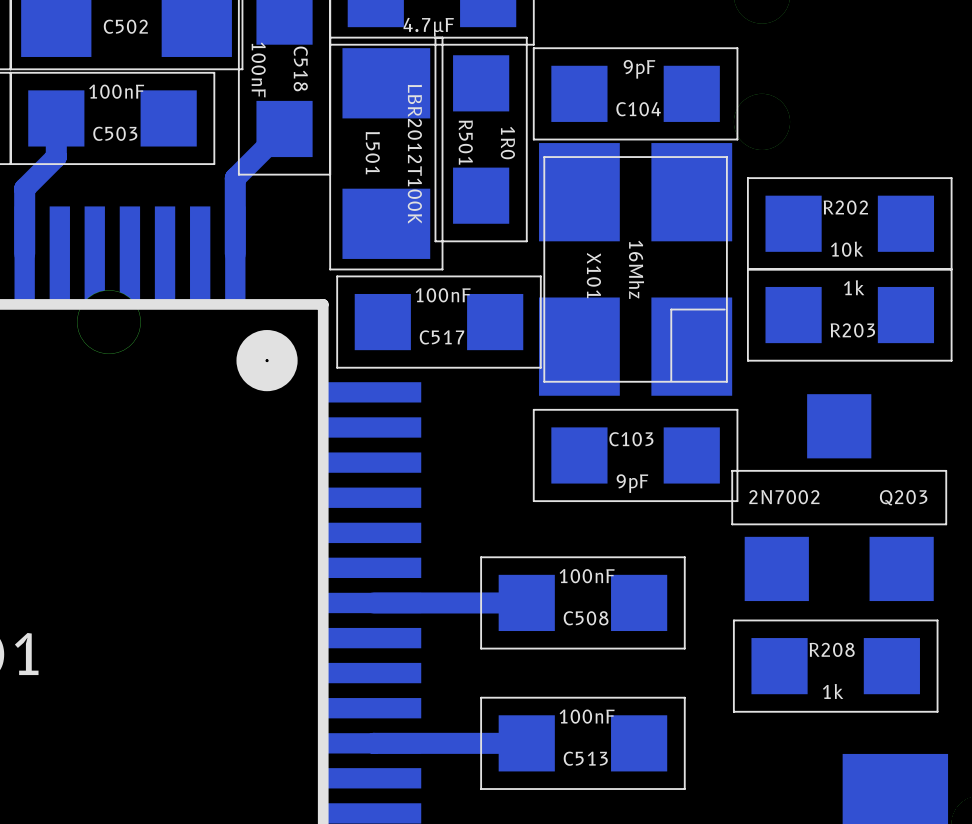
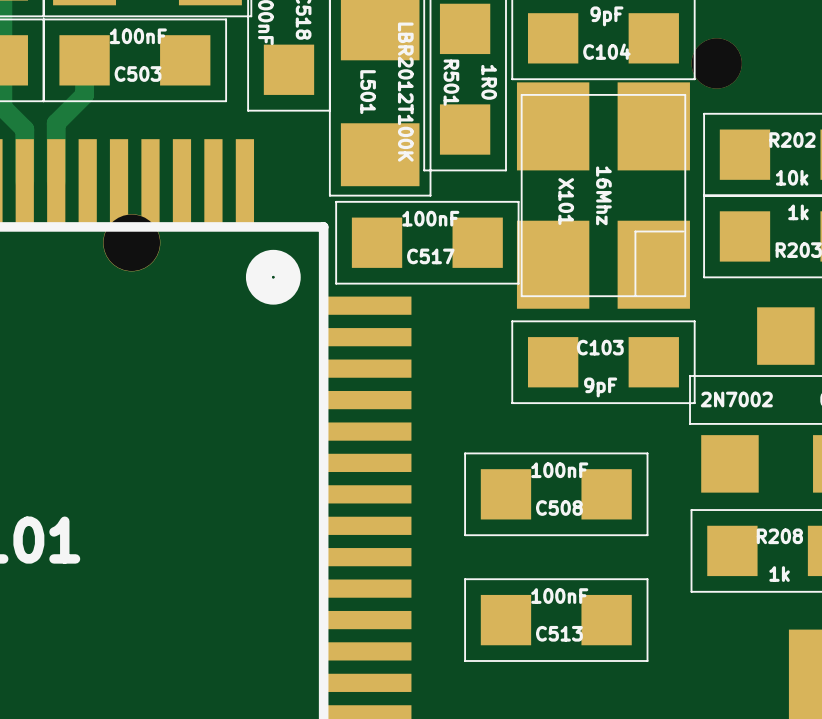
track: (284, 128) (235, 178) (235, 253) -> none
track: (526, 602) (373, 602) -> none
track: (526, 743) (373, 743) -> none

